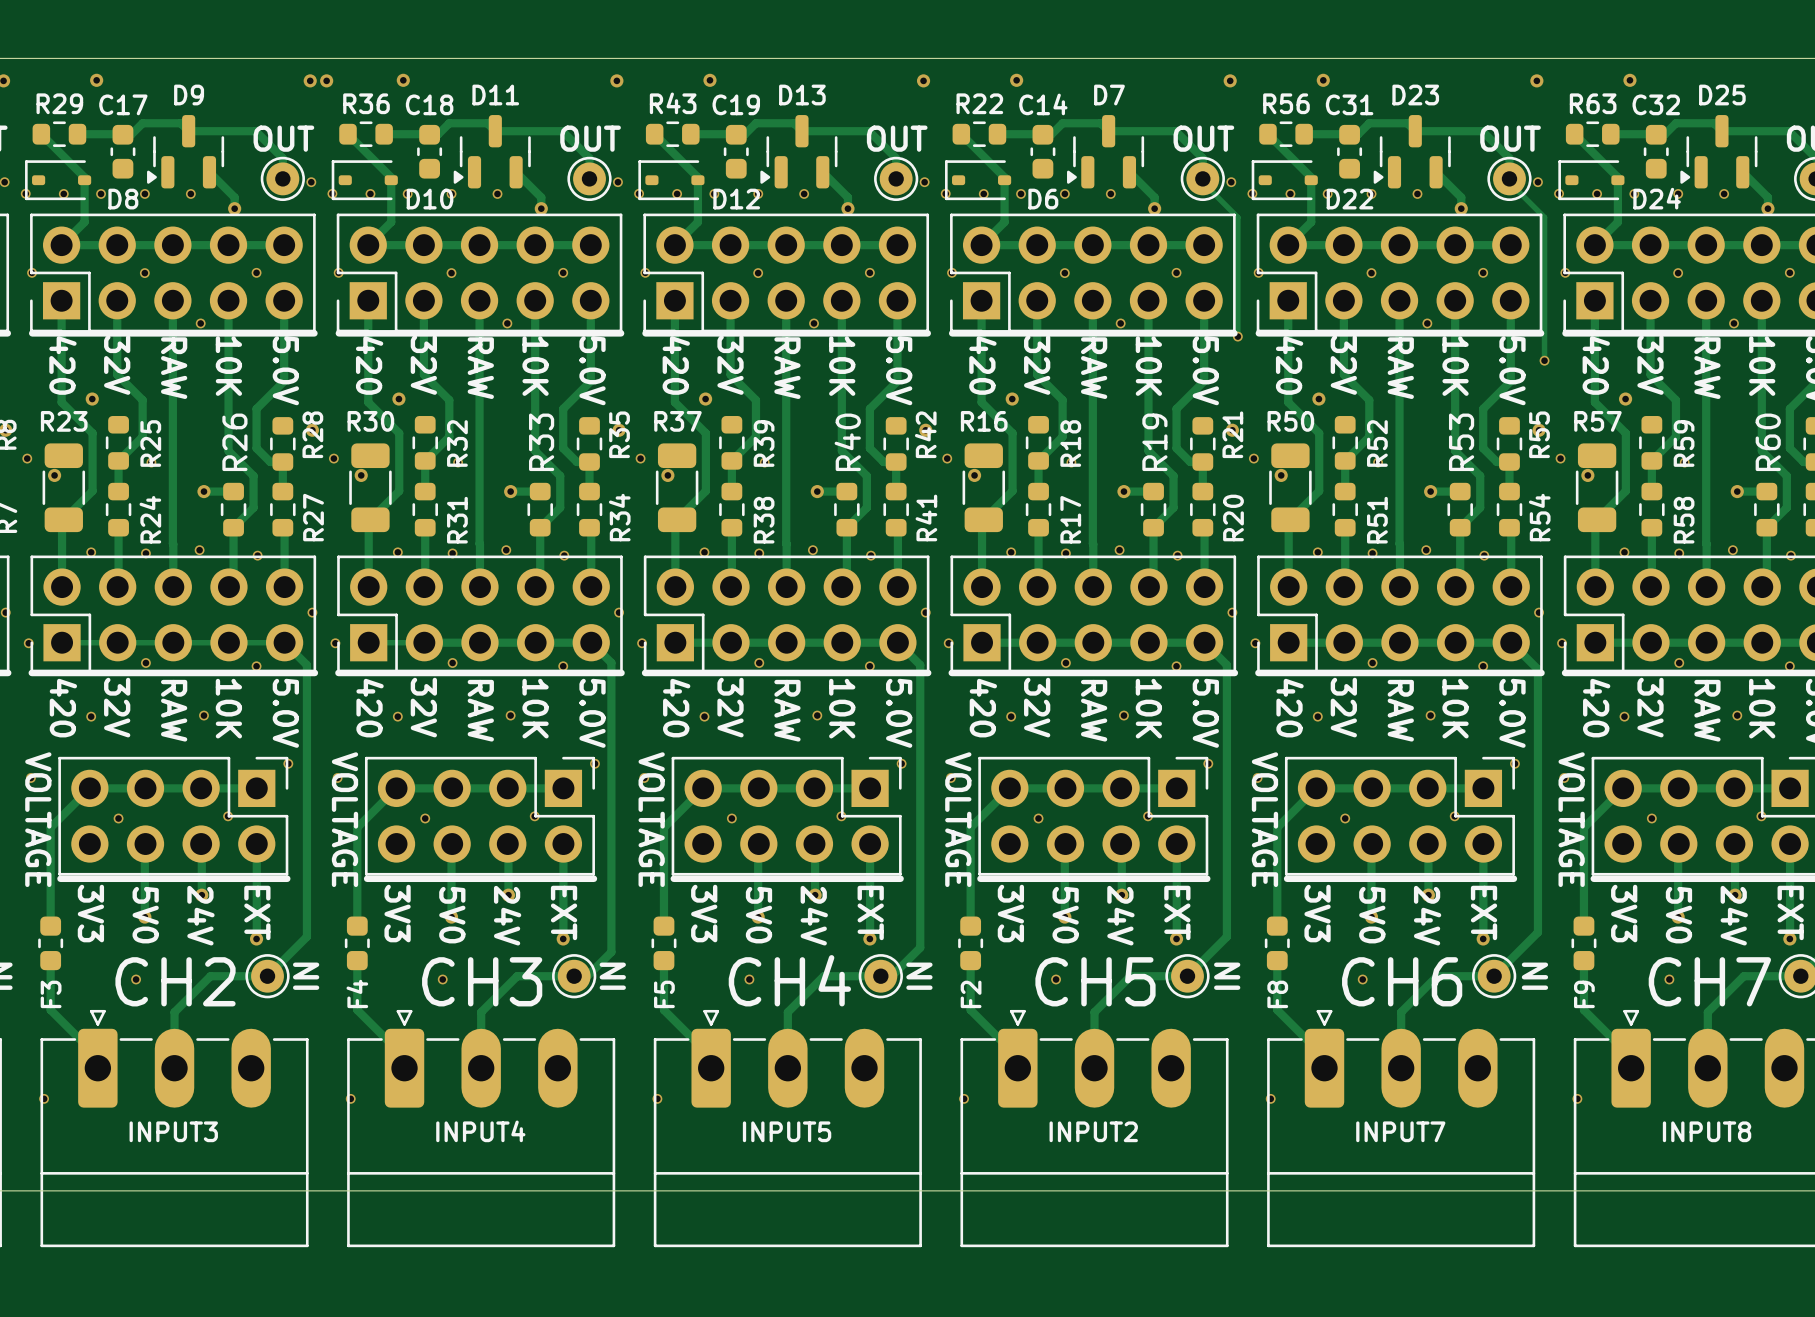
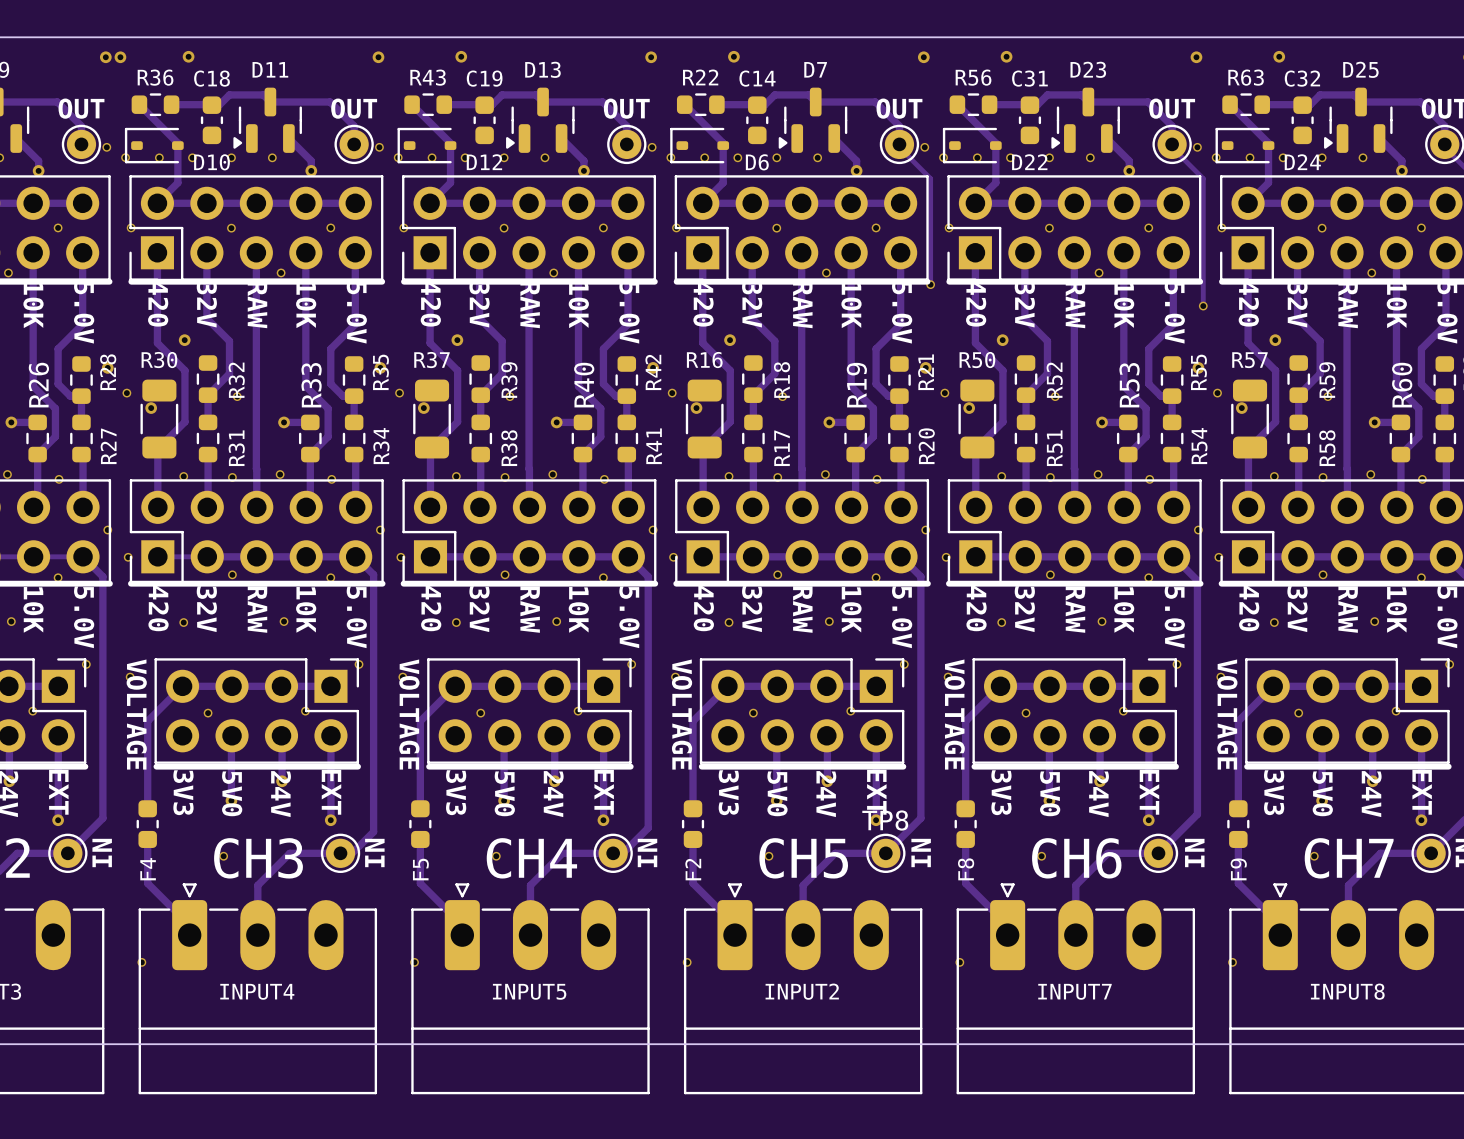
TP8 name: none -> TP8 (885, 820)

